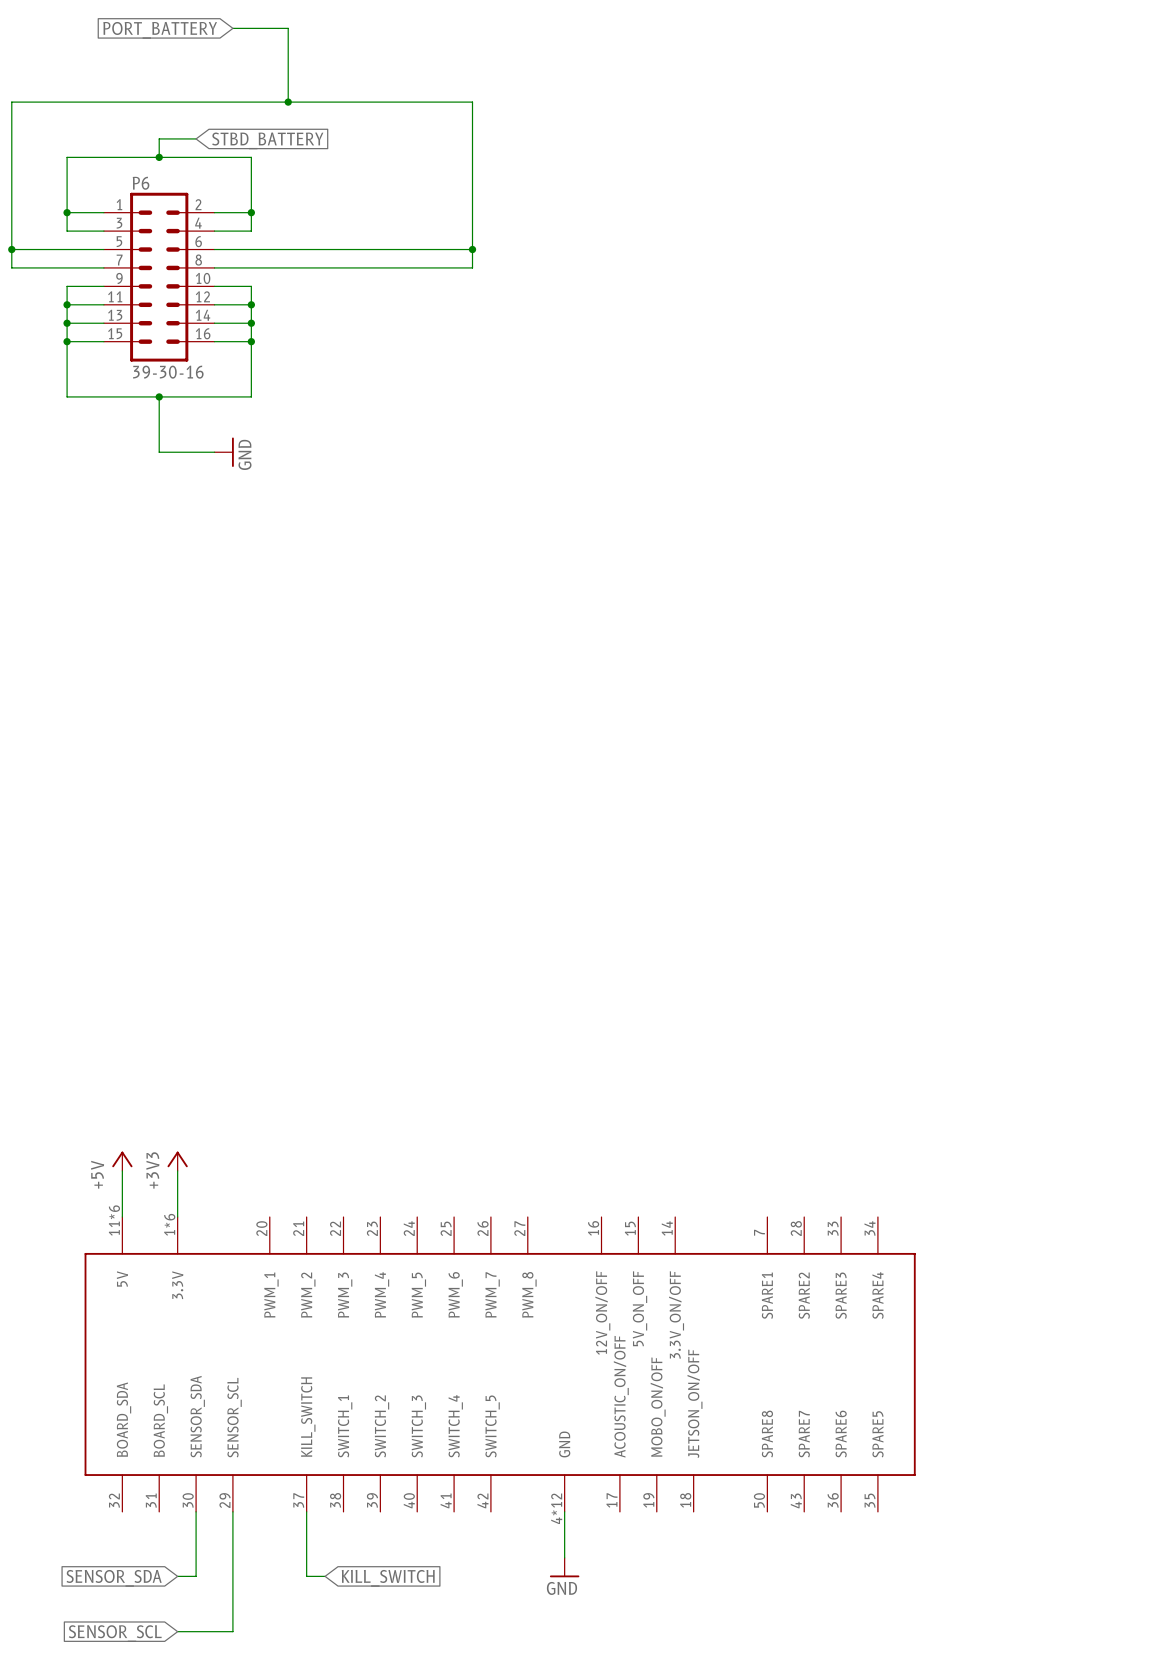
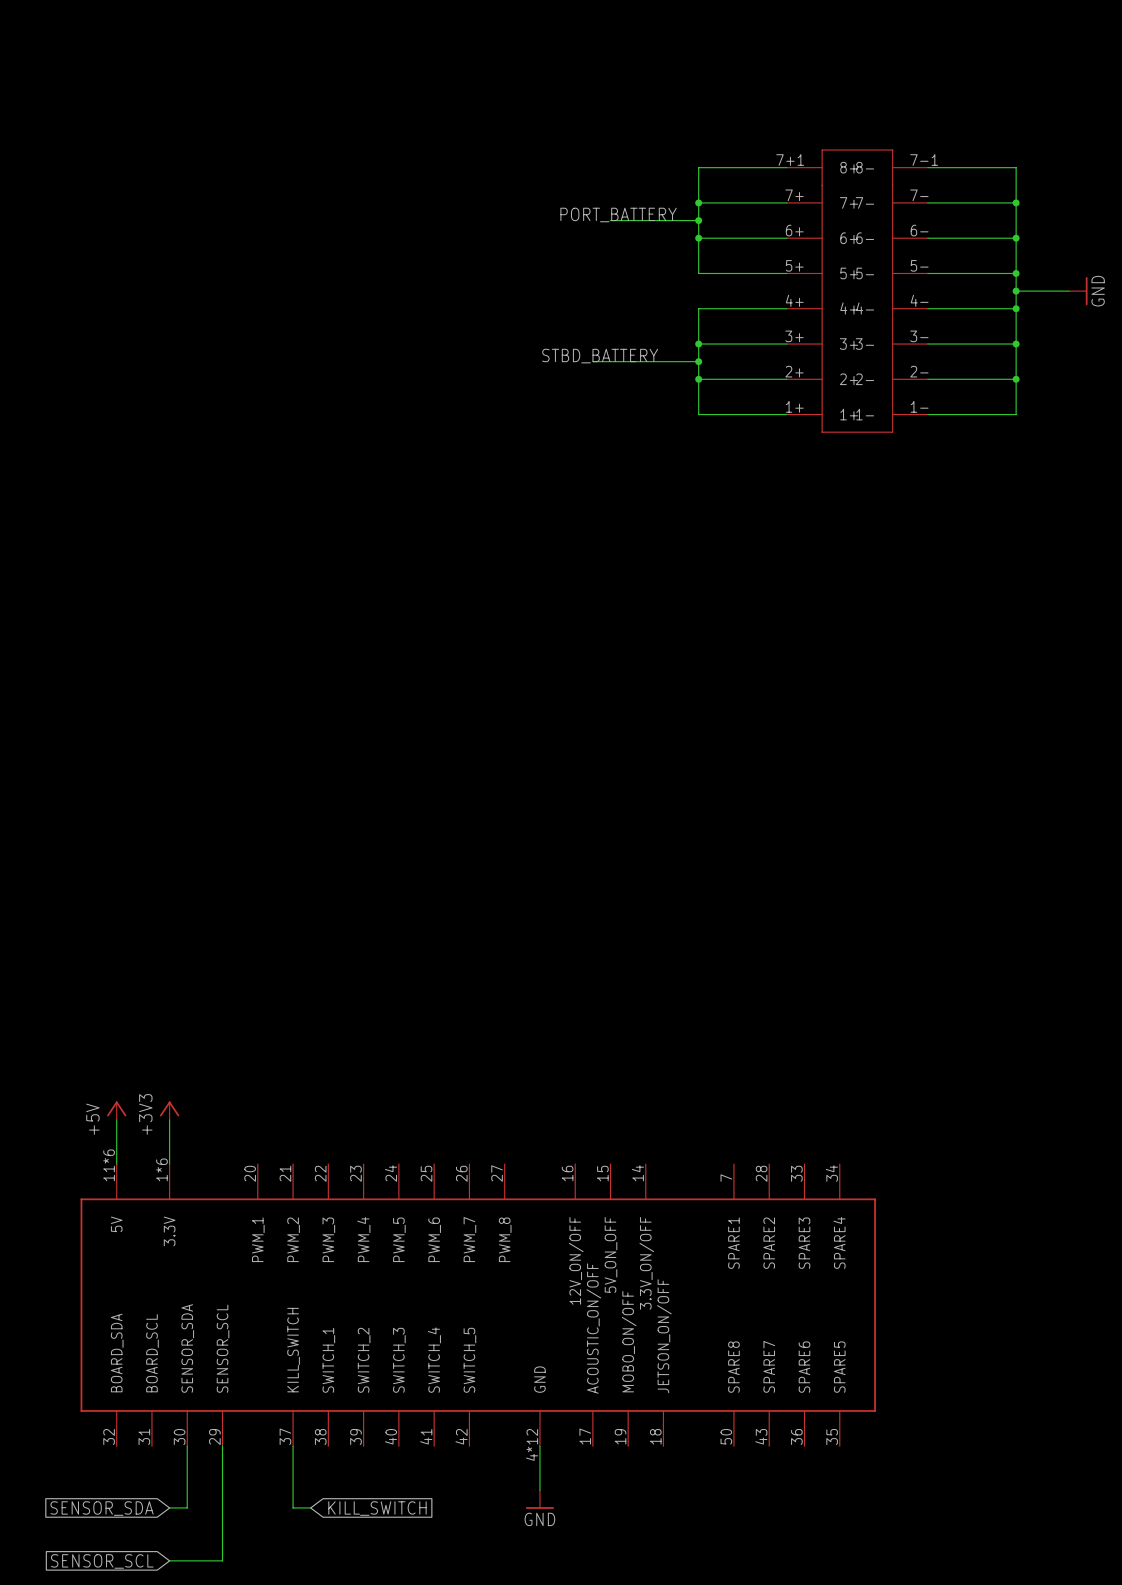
wire: (232, 28) (288, 28) (288, 102) -> none
global label: PORT_BATTERY (160, 30) -> none
junction: (288, 102) -> none
wire: (196, 138) (159, 138) (159, 157) -> none
global label: STBD_BATTERY (267, 140) -> none
junction: (159, 157) -> none
wire: none -> (786, 167) (698, 167) (698, 273) (786, 273)
wire: none -> (927, 167) (1016, 167) (1016, 414) (927, 414)
wire: (67, 212) (103, 212) -> none
junction: (67, 212) -> none
wire: (214, 212) (251, 212) -> none
junction: (251, 212) -> none
wire: none -> (698, 202) (786, 202)
junction: none -> (698, 202)
wire: none -> (927, 202) (1016, 202)
junction: none -> (1016, 202)
label: none -> PORT_BATTERY (618, 214)
wire: (103, 231) (67, 231) (67, 157) (251, 157) (251, 231) (214, 231) -> none
wire: none -> (610, 220) (698, 220)
junction: none -> (698, 220)
wire: (11, 249) (103, 249) -> none
junction: (11, 249) -> none
wire: (214, 249) (472, 249) -> none
junction: (472, 249) -> none
wire: none -> (698, 238) (786, 238)
junction: none -> (698, 238)
wire: none -> (927, 238) (1016, 238)
junction: none -> (1016, 238)
wire: (103, 267) (11, 267) (11, 102) (472, 102) (472, 267) (214, 267) -> none
P6: 39-30-16 (159, 277) -> none
wire: (103, 286) (67, 286) (67, 396) (251, 396) (251, 286) (214, 286) -> none
wire: none -> (927, 273) (1016, 273)
junction: none -> (1016, 273)
wire: (67, 304) (103, 304) -> none
junction: (67, 304) -> none
wire: (214, 304) (251, 304) -> none
junction: (251, 304) -> none
part: none -> (857, 291)
wire: none -> (1016, 291) (1069, 291)
junction: none -> (1016, 291)
power symbol: none -> GND (1078, 291)
wire: (67, 323) (103, 323) -> none
junction: (67, 323) -> none
wire: (214, 323) (251, 323) -> none
junction: (251, 323) -> none
wire: none -> (786, 308) (698, 308) (698, 414) (786, 414)
wire: none -> (927, 308) (1016, 308)
junction: none -> (1016, 308)
wire: (67, 341) (103, 341) -> none
junction: (67, 341) -> none
wire: (214, 341) (251, 341) -> none
junction: (251, 341) -> none
wire: none -> (698, 344) (786, 344)
junction: none -> (698, 344)
wire: none -> (927, 344) (1016, 344)
junction: none -> (1016, 344)
label: none -> STBD_BATTERY (600, 356)
wire: none -> (592, 361) (698, 361)
junction: none -> (698, 361)
wire: (159, 396) (159, 452) (214, 452) -> none
junction: (159, 396) -> none
wire: none -> (698, 379) (786, 379)
junction: none -> (698, 379)
wire: none -> (927, 379) (1016, 379)
junction: none -> (1016, 379)
power symbol: GND (224, 452) -> none

